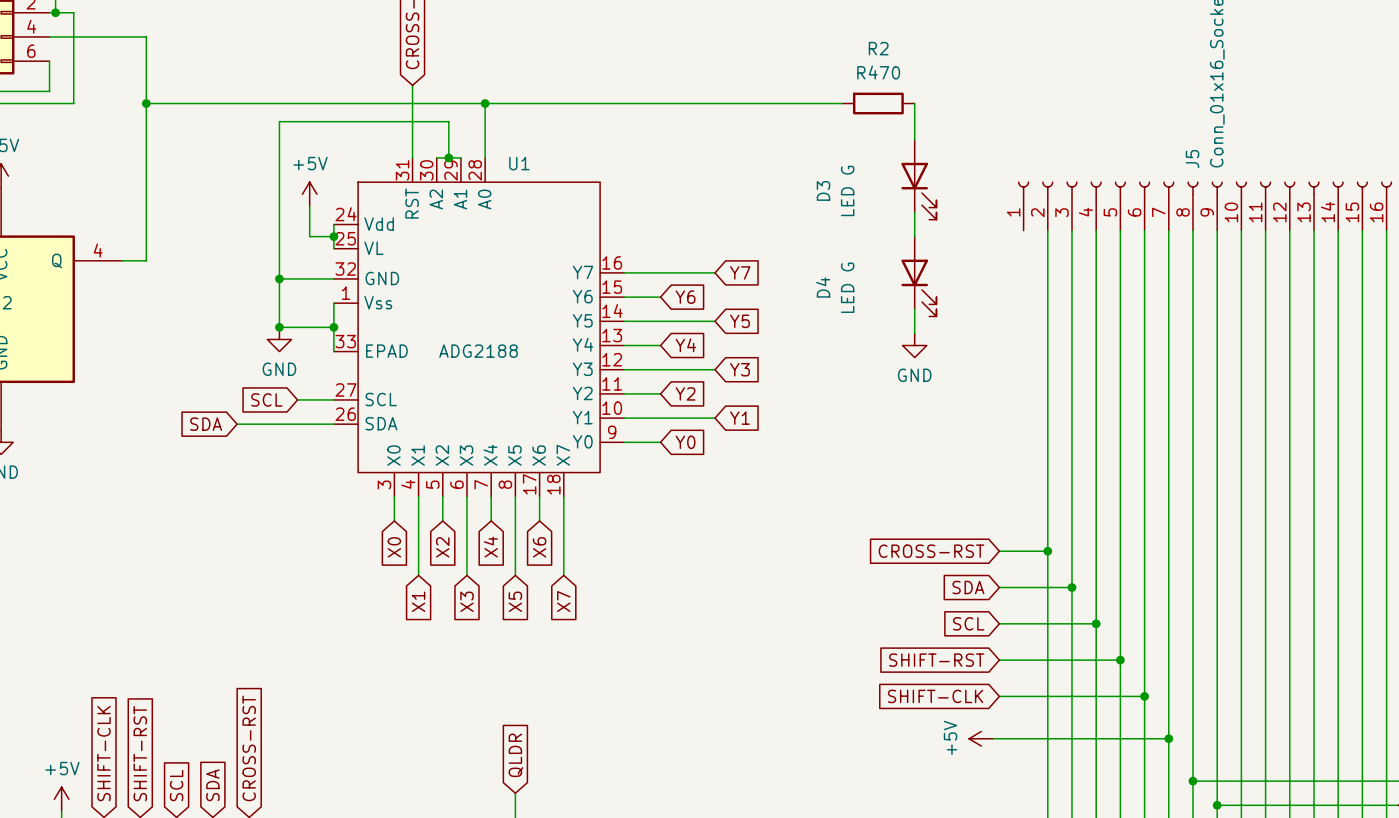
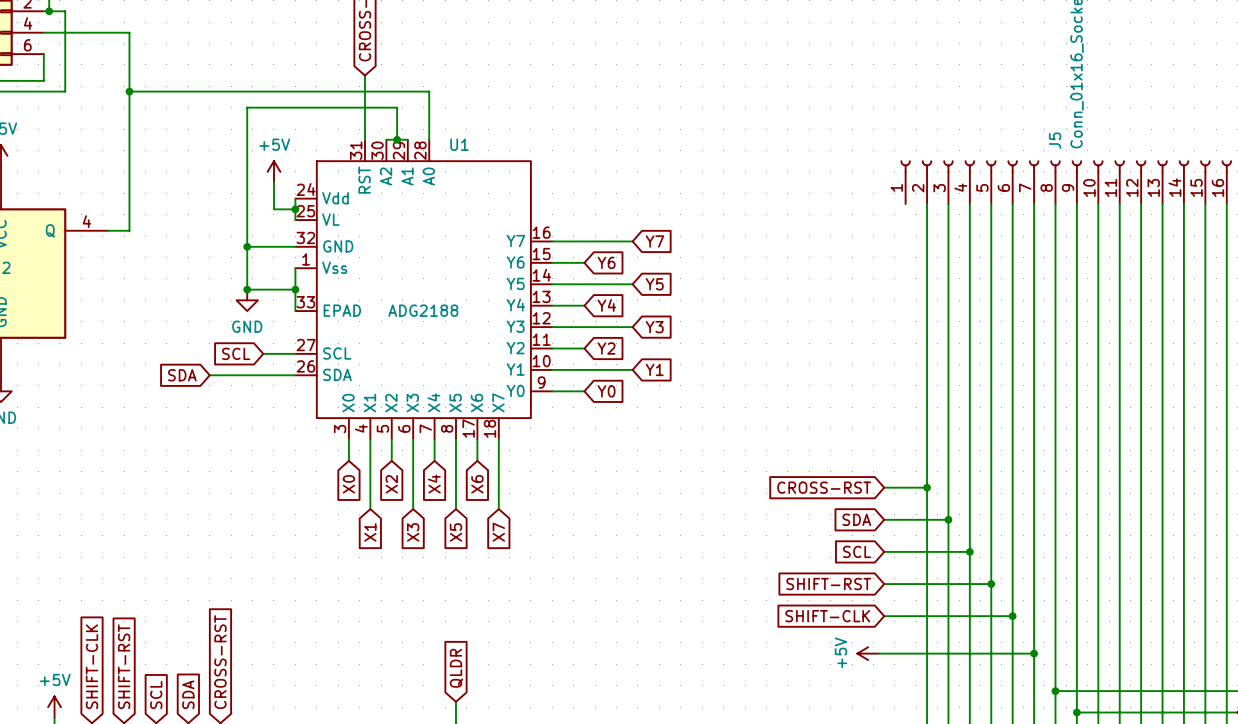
wire: (485, 103) (842, 103) -> none
junction: (485, 103) -> none
R2: R470 (878, 103) -> none
wire: (914, 103) (914, 139) -> none
D3: LED G (918, 179) -> none
wire: (914, 212) (914, 236) -> none
D4: LED G (918, 276) -> none
wire: (914, 309) (914, 333) -> none
power symbol: GND (914, 345) -> none

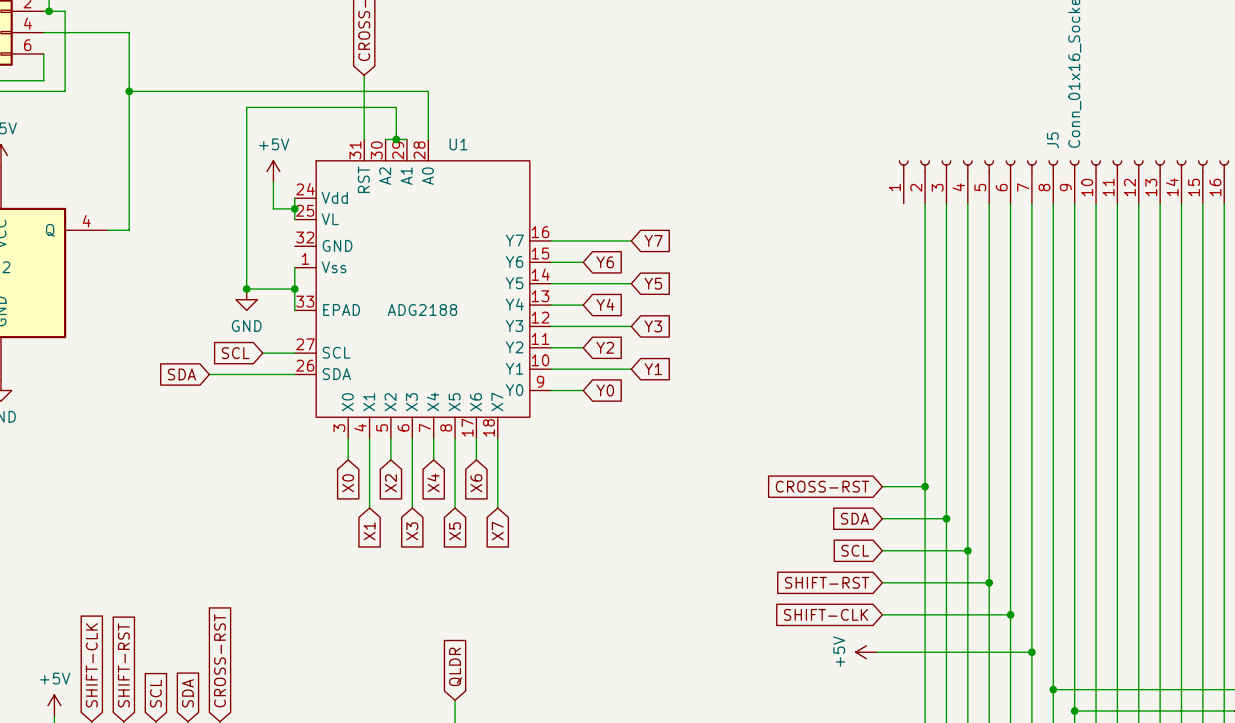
wire: (247, 246) (295, 246) -> none
junction: (247, 246) -> none

